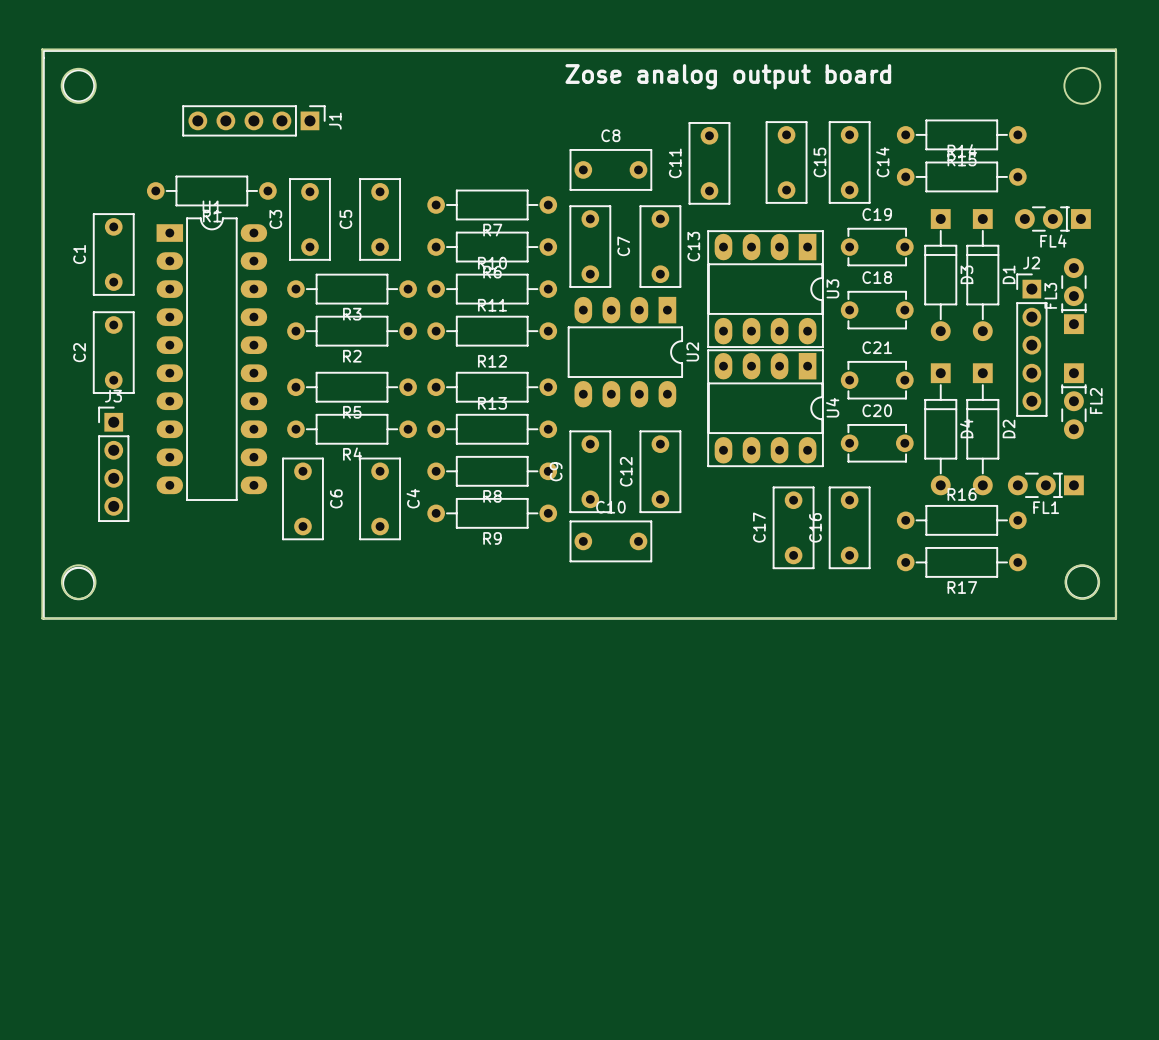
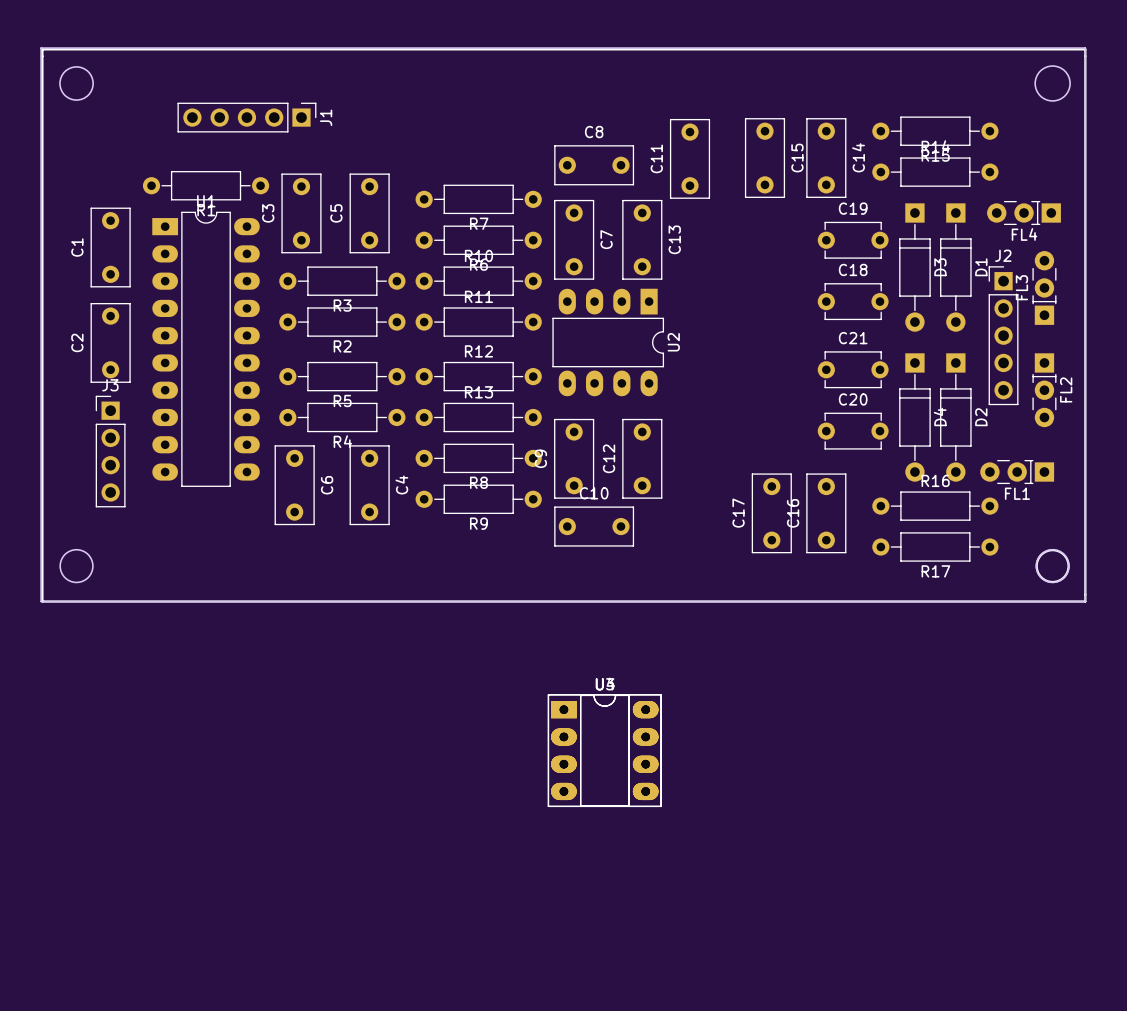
drawing: [61, 69, 96, 103] -> none
text: Zose analog output board (728, 76) -> none
U3 rotation: 0° (765, 289) -> 90° counterclockwise (604, 750)
U3 position: (765, 289) -> (604, 750)
U4 rotation: 0° (765, 408) -> 90° counterclockwise (604, 750)
U4 position: (765, 408) -> (604, 750)
drawing: [61, 566, 96, 601] -> none

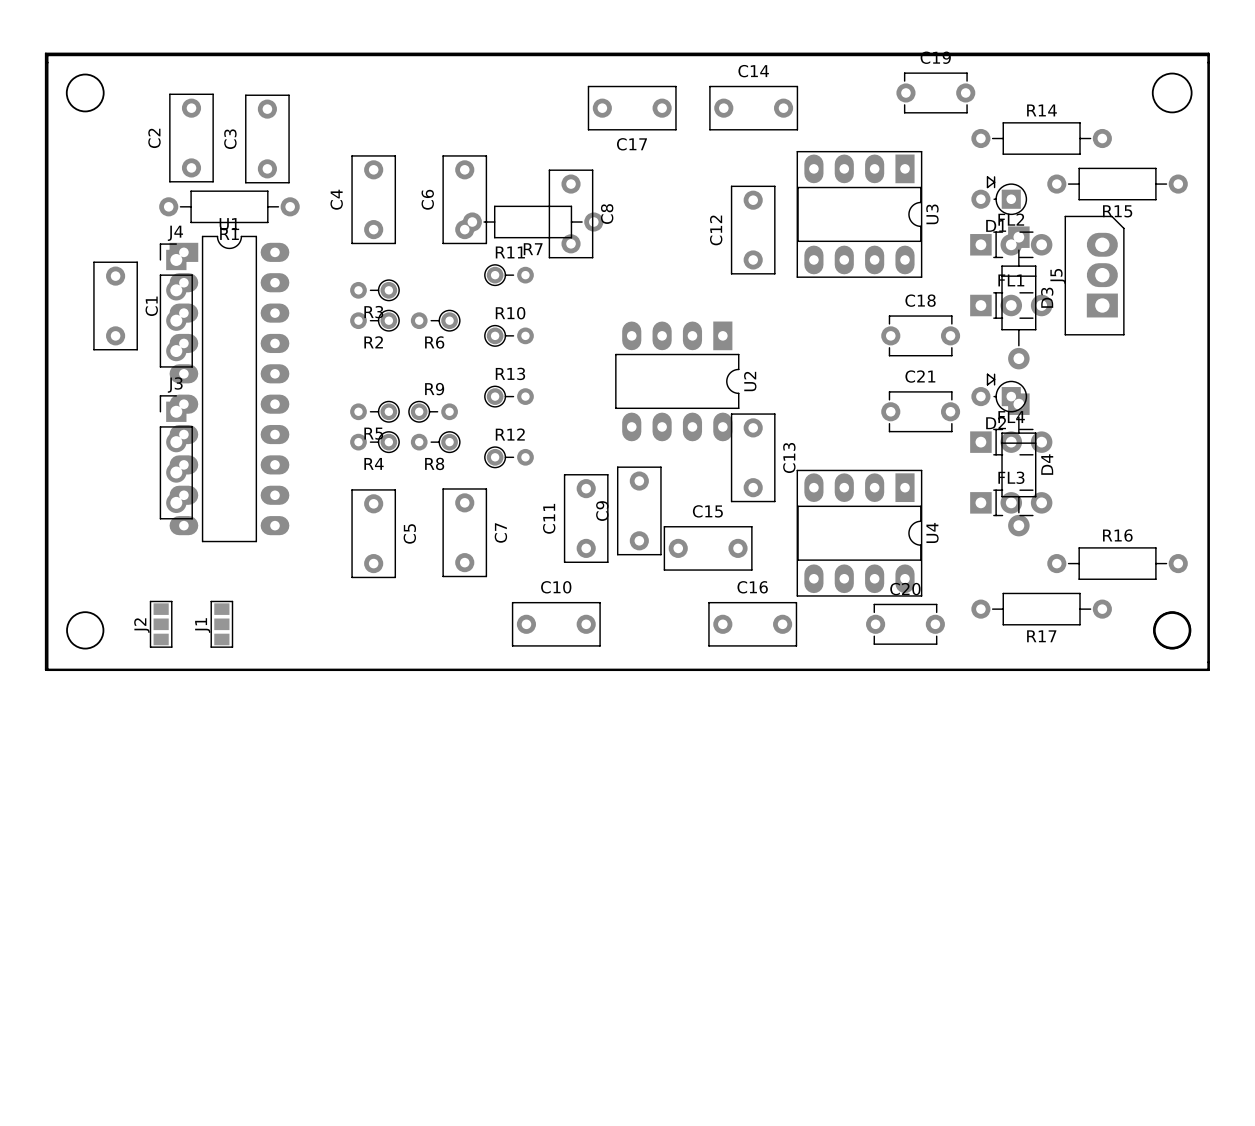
J1 footprint: [177, 102, 317, 133] -> [210, 600, 234, 648]
J1 name position: J1 (326, 117) -> J1 (202, 625)
R15 position: (935, 131) -> (1117, 184)
C14 name position: C14 (858, 157) -> C14 (753, 71)
C11 position: (690, 158) -> (586, 518)
C15 rotation: 0° (764, 158) -> 90° clockwise (708, 548)
C15 position: (764, 158) -> (708, 548)
C15 name position: C15 (797, 158) -> C15 (707, 511)
C14 rotation: 0° (826, 158) -> 90° clockwise (753, 108)
C14 position: (826, 158) -> (753, 108)
C8 rotation: 0° (594, 165) -> 90° clockwise (571, 213)
C8 position: (594, 165) -> (571, 213)
R14 position: (935, 172) -> (1041, 138)
D1 footprint: [940, 203, 972, 332] -> [971, 176, 1028, 216]
C3 position: (301, 213) -> (267, 138)
C5 name position: C5 (336, 213) -> C5 (409, 533)
C5 position: (369, 213) -> (373, 533)
FL4 rotation: 0° (1024, 213) -> 180° (1011, 442)
FL4 position: (1024, 213) -> (1011, 442)
R6 footprint: [415, 225, 542, 255] -> [410, 309, 461, 332]
C7 position: (574, 239) -> (464, 532)
C13 position: (642, 239) -> (753, 457)
C19 position: (853, 240) -> (935, 92)
C1 name position: C1 (77, 247) -> C1 (151, 306)
C1 position: (110, 247) -> (115, 305)
J5: none -> (1094, 275)
J2 name position: J2 (1003, 255) -> J2 (141, 625)
R3 footprint: [279, 266, 406, 296] -> [350, 279, 400, 302]
R10 footprint: [415, 266, 542, 296] -> [484, 324, 534, 347]
J2 footprint: [988, 266, 1019, 406] -> [149, 600, 173, 648]
D1 name position: D1 (981, 267) -> D1 (996, 225)
J4: none -> (176, 305)
FL3 rotation: 0° (1044, 287) -> 90° clockwise (1011, 502)
FL3 position: (1044, 287) -> (1011, 502)
C18 position: (853, 301) -> (920, 335)
R2 footprint: [279, 307, 406, 337] -> [350, 309, 400, 332]
R11 footprint: [415, 307, 542, 337] -> [484, 264, 534, 287]
C2 position: (110, 342) -> (191, 138)
D2 footprint: [940, 353, 972, 482] -> [971, 373, 1028, 413]
R5 footprint: [279, 361, 406, 392] -> [350, 400, 400, 423]
R12 footprint: [415, 361, 542, 392] -> [484, 446, 534, 469]
C21 position: (853, 369) -> (920, 411)
FL2 rotation: 0° (1044, 390) -> 90° counterclockwise (1011, 244)
FL2 position: (1044, 390) -> (1011, 244)
R4 footprint: [279, 402, 406, 433] -> [350, 431, 400, 454]
R13 footprint: [415, 402, 542, 433] -> [484, 385, 534, 408]
D2 name position: D2 (981, 417) -> D2 (996, 423)
C20 position: (853, 431) -> (905, 624)
R8 footprint: [415, 443, 542, 474] -> [410, 431, 461, 454]
J3 position: (110, 451) -> (176, 457)
C12 position: (642, 458) -> (753, 230)
FL1 rotation: 0° (1017, 472) -> 180° (1011, 305)
FL1 position: (1017, 472) -> (1011, 305)
C4 name position: C4 (401, 484) -> C4 (336, 199)
R9 footprint: [415, 484, 542, 514] -> [408, 400, 458, 423]
C6 position: (294, 485) -> (464, 199)
C6 name position: C6 (327, 485) -> C6 (427, 199)
C4 position: (369, 485) -> (373, 199)
R16 position: (935, 506) -> (1117, 563)
C17 name position: C17 (738, 513) -> C17 (631, 144)
C17 rotation: 0° (771, 513) -> 90° clockwise (632, 108)
C17 position: (771, 513) -> (632, 108)
C16 rotation: 0° (826, 513) -> 90° clockwise (752, 624)
C16 position: (826, 513) -> (752, 624)
R9 name position: R9 (478, 523) -> R9 (434, 389)
C10 position: (594, 526) -> (556, 624)
U3 rotation: 0° (604, 750) -> 90° clockwise (859, 214)
U3 position: (604, 750) -> (859, 214)
U4 rotation: 0° (604, 750) -> 90° clockwise (859, 533)
U4 position: (604, 750) -> (859, 533)

